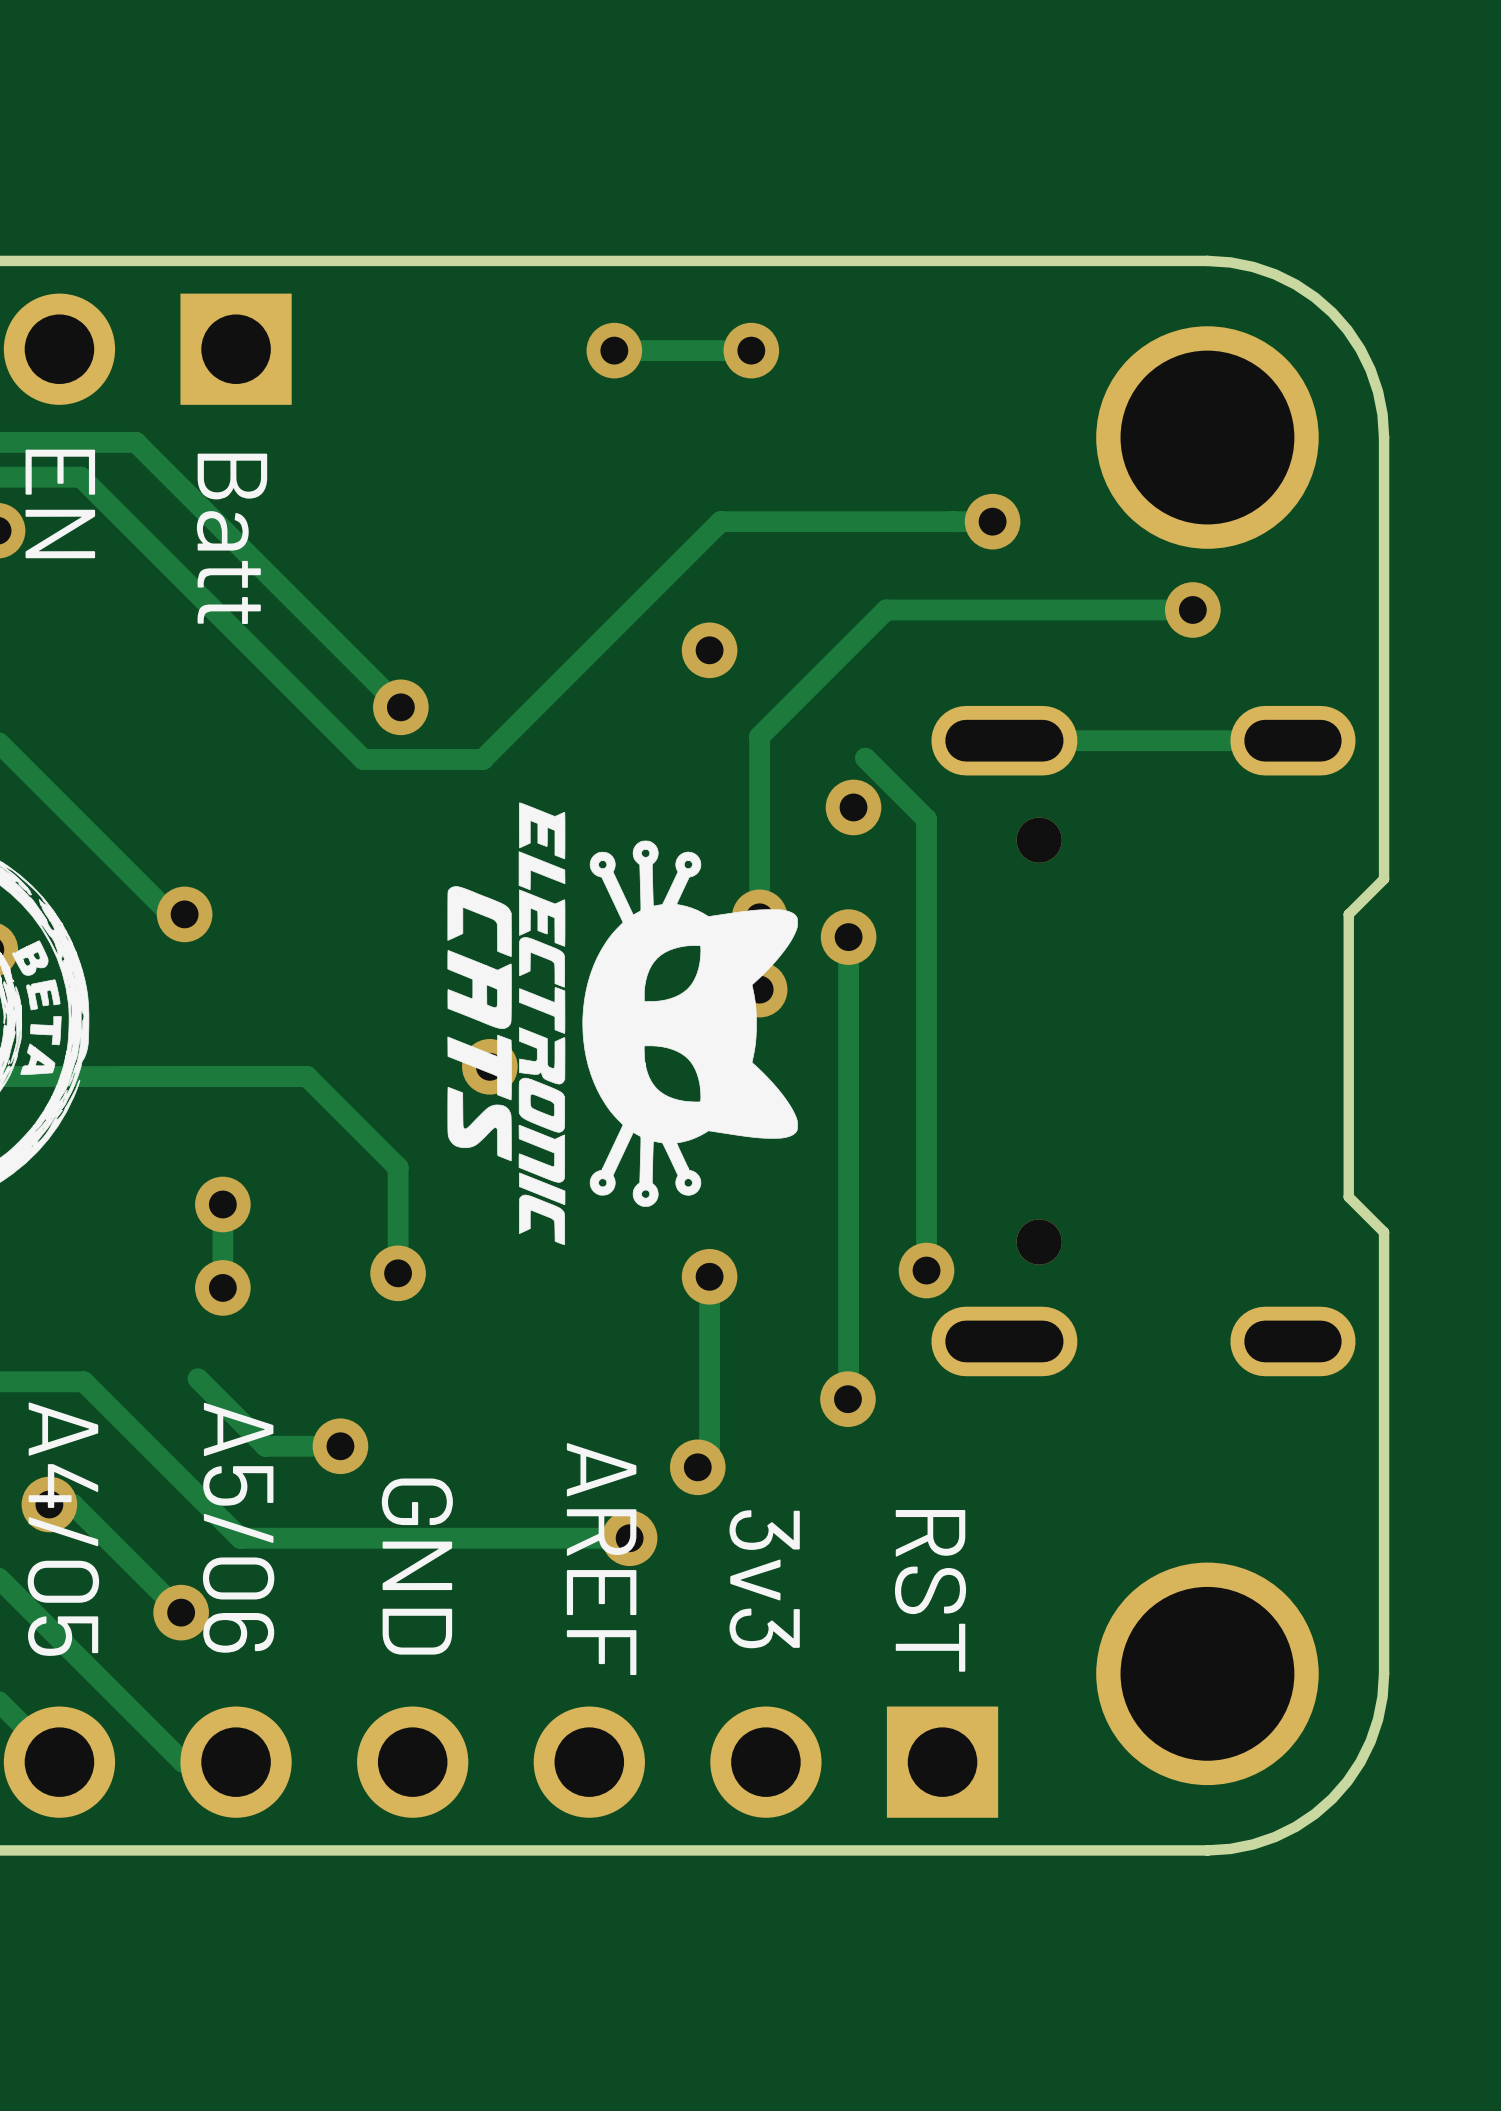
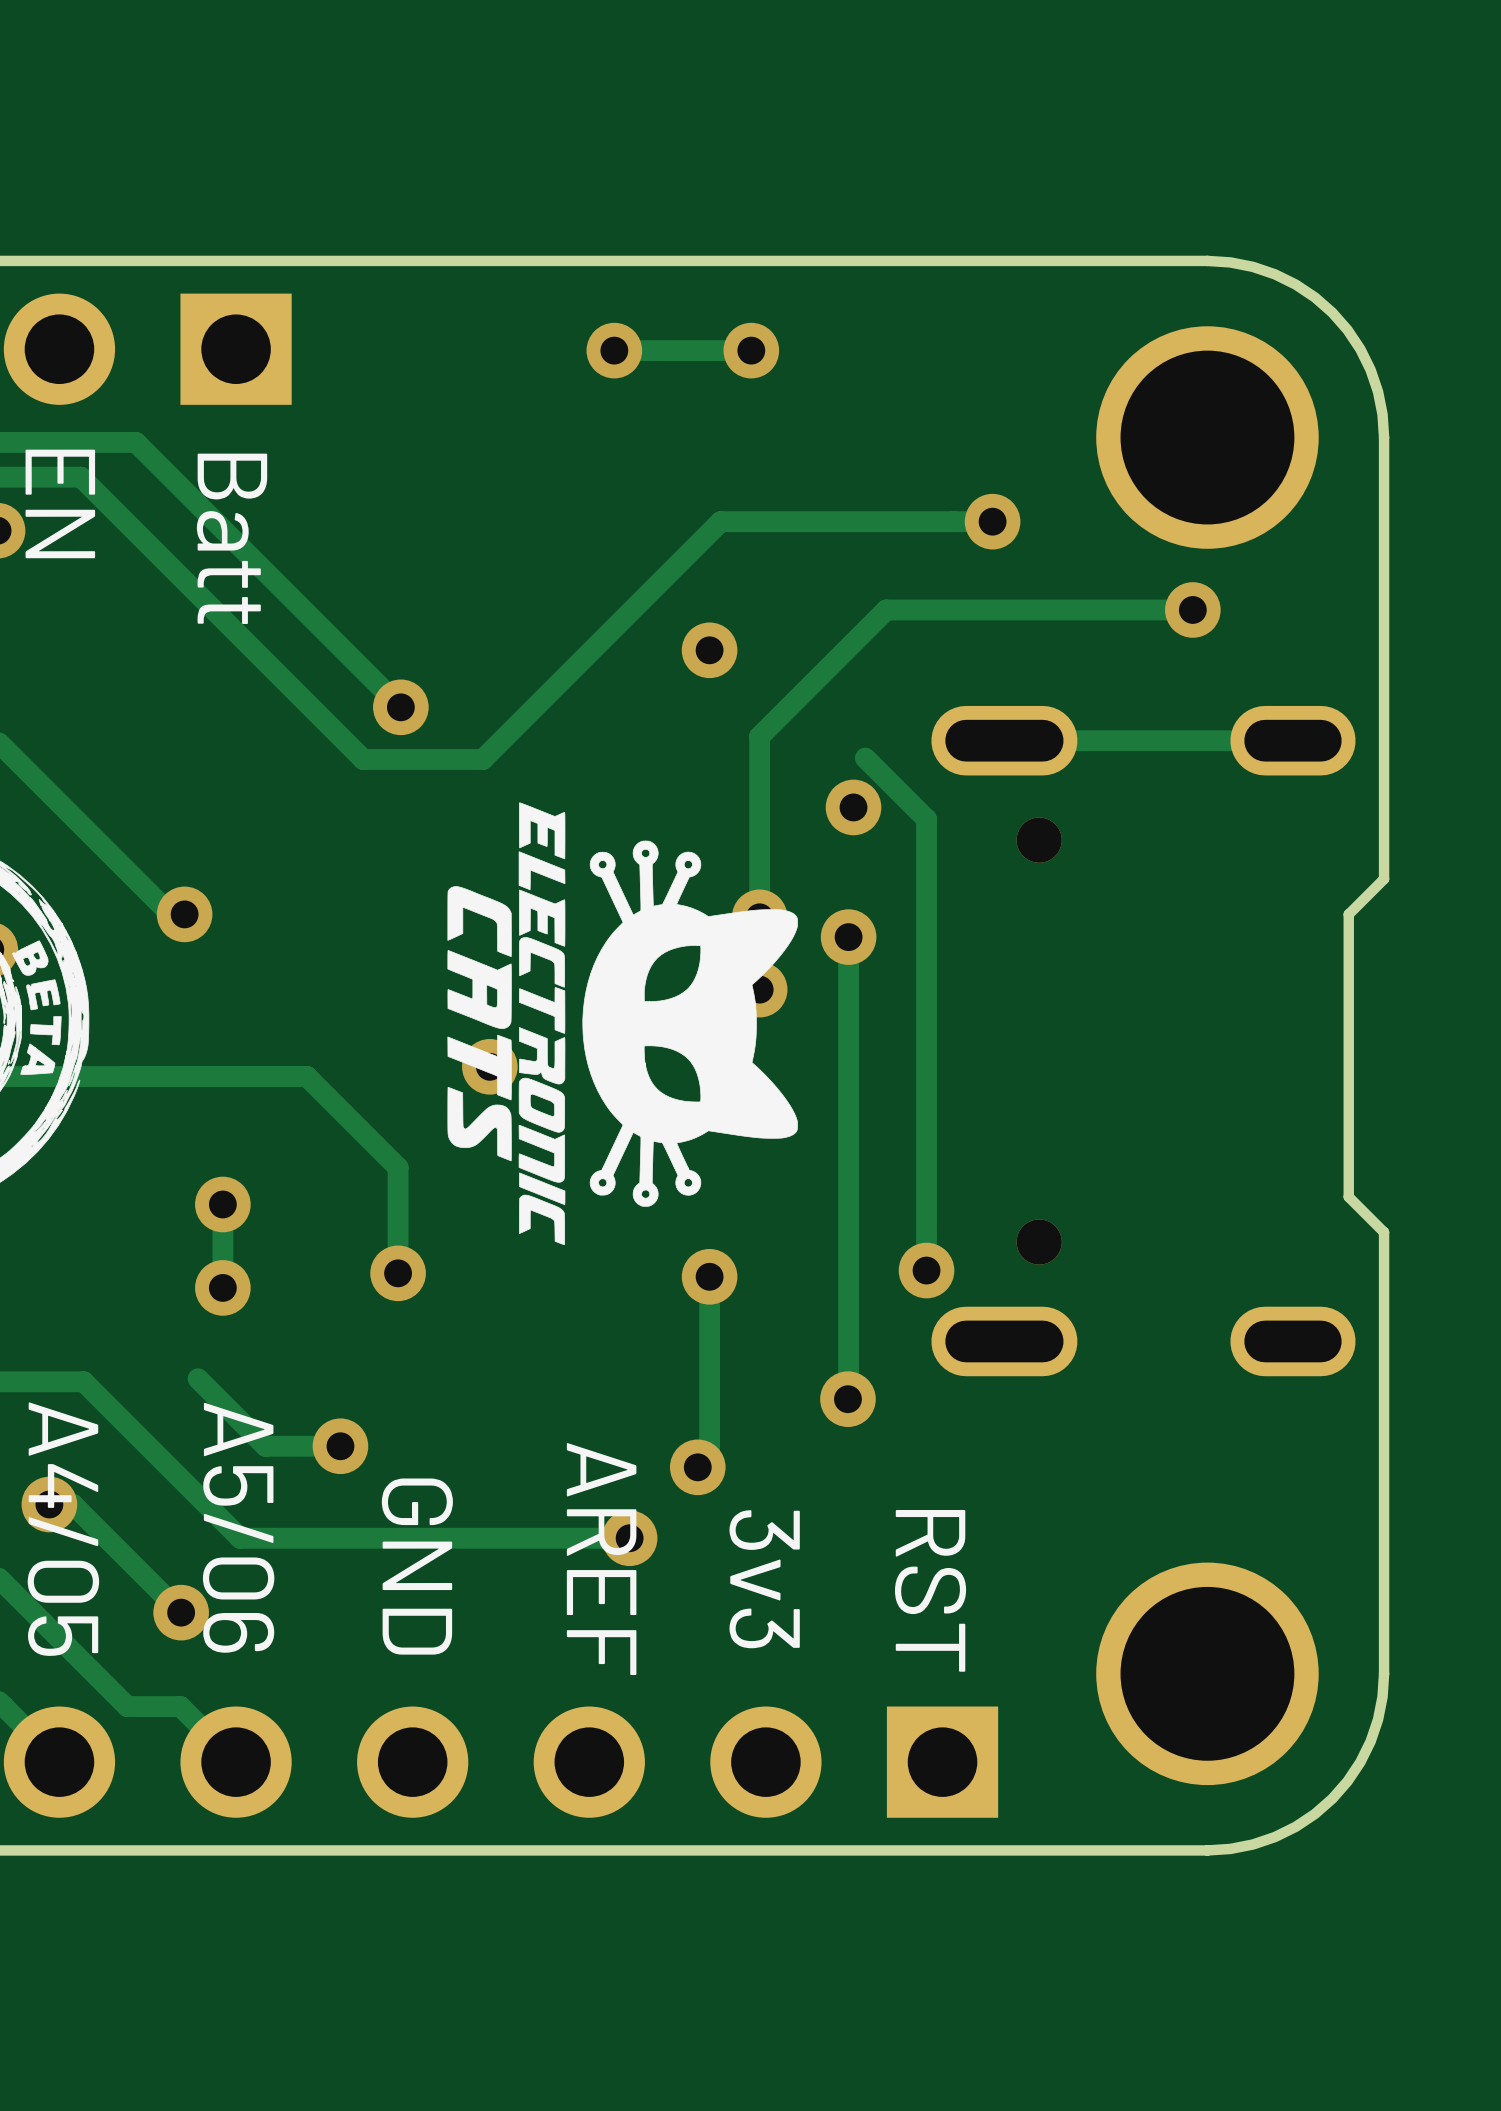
track: (127, 1706) (182, 1762) (236, 1762) -> (127, 1706) (180, 1706) (236, 1762)

